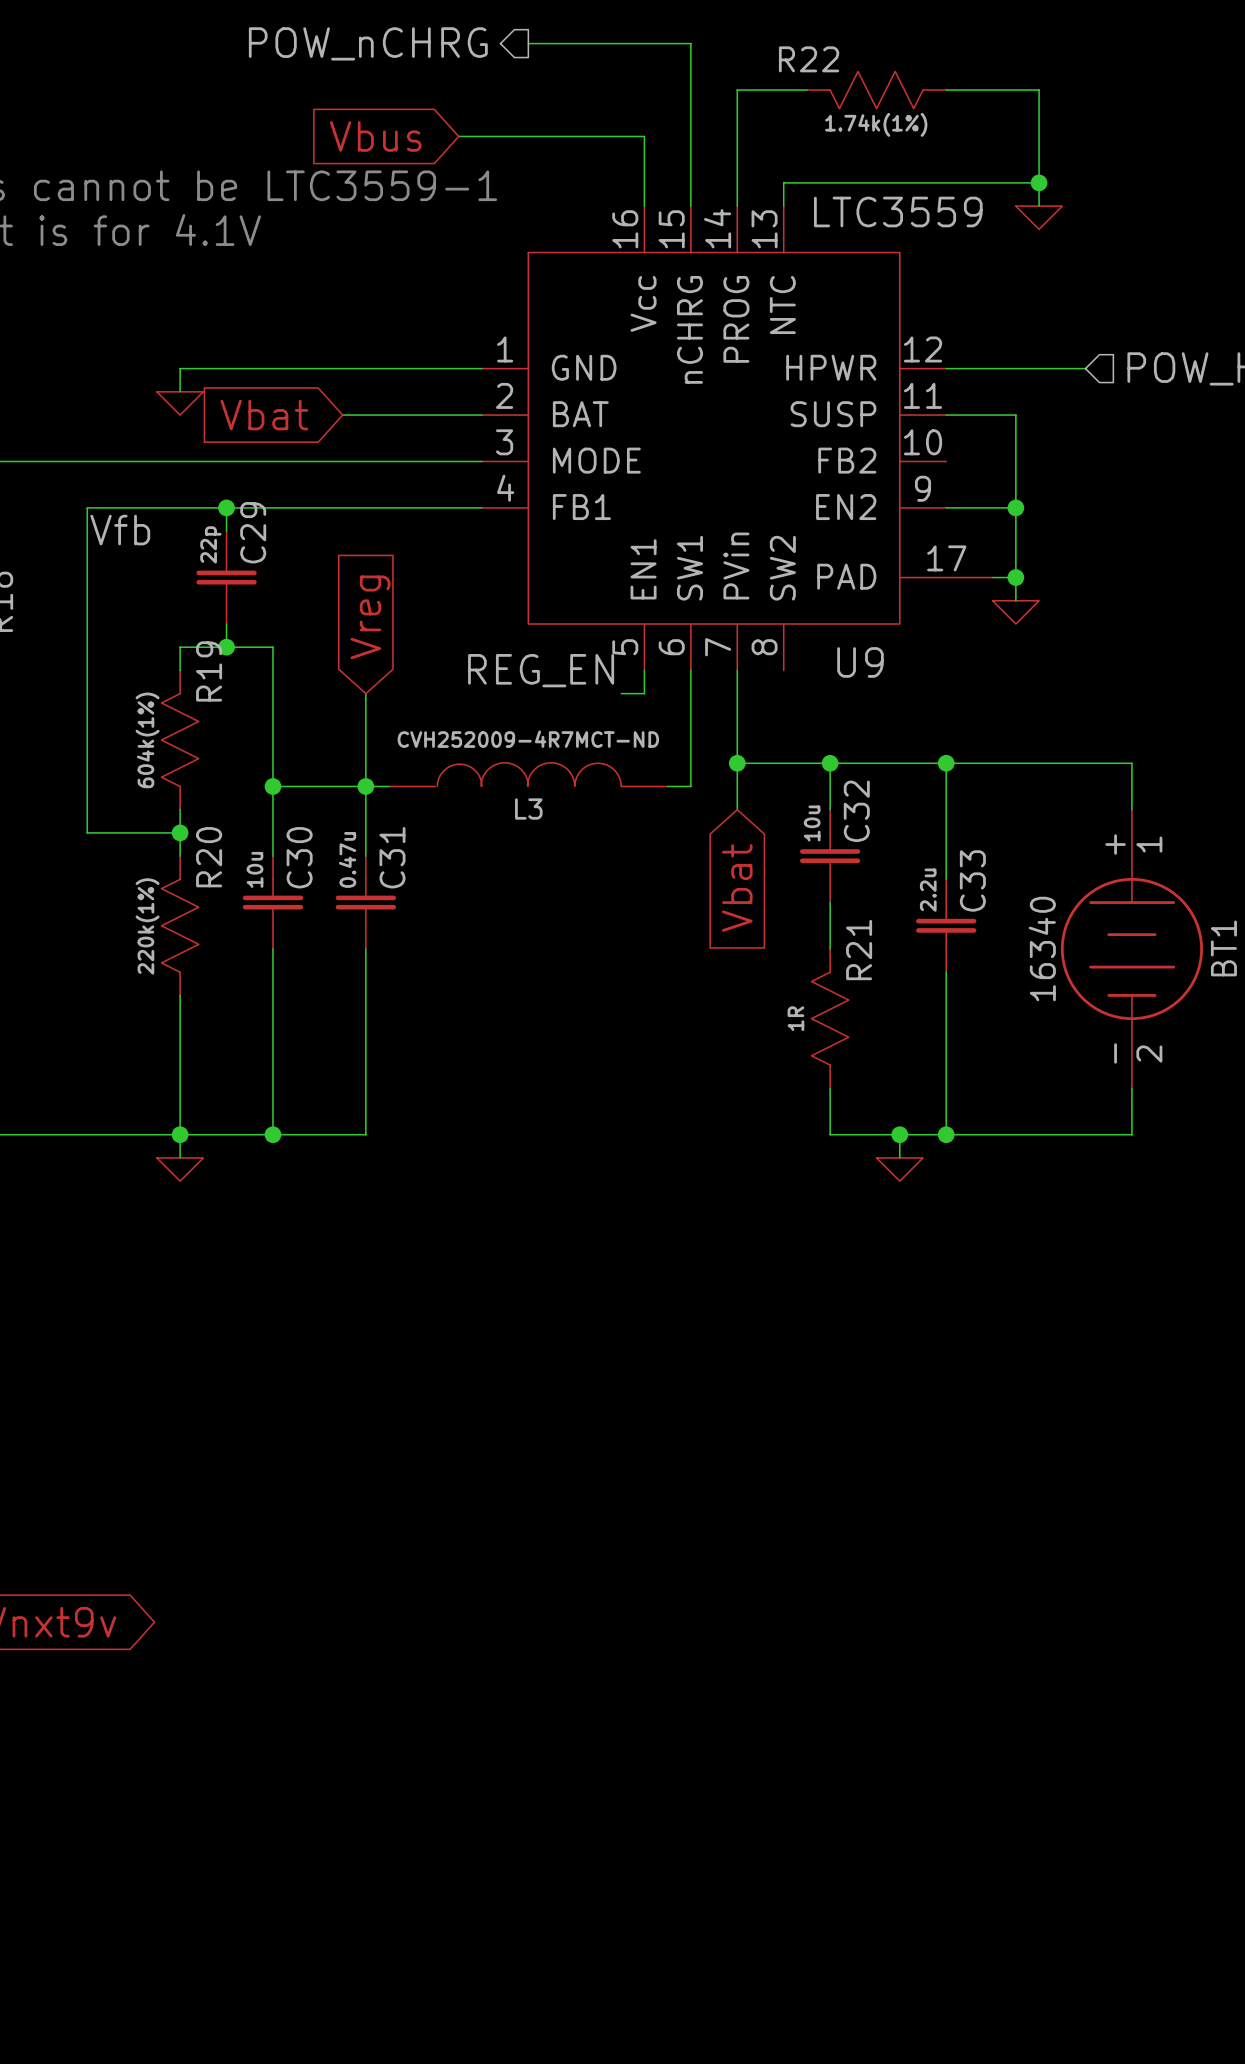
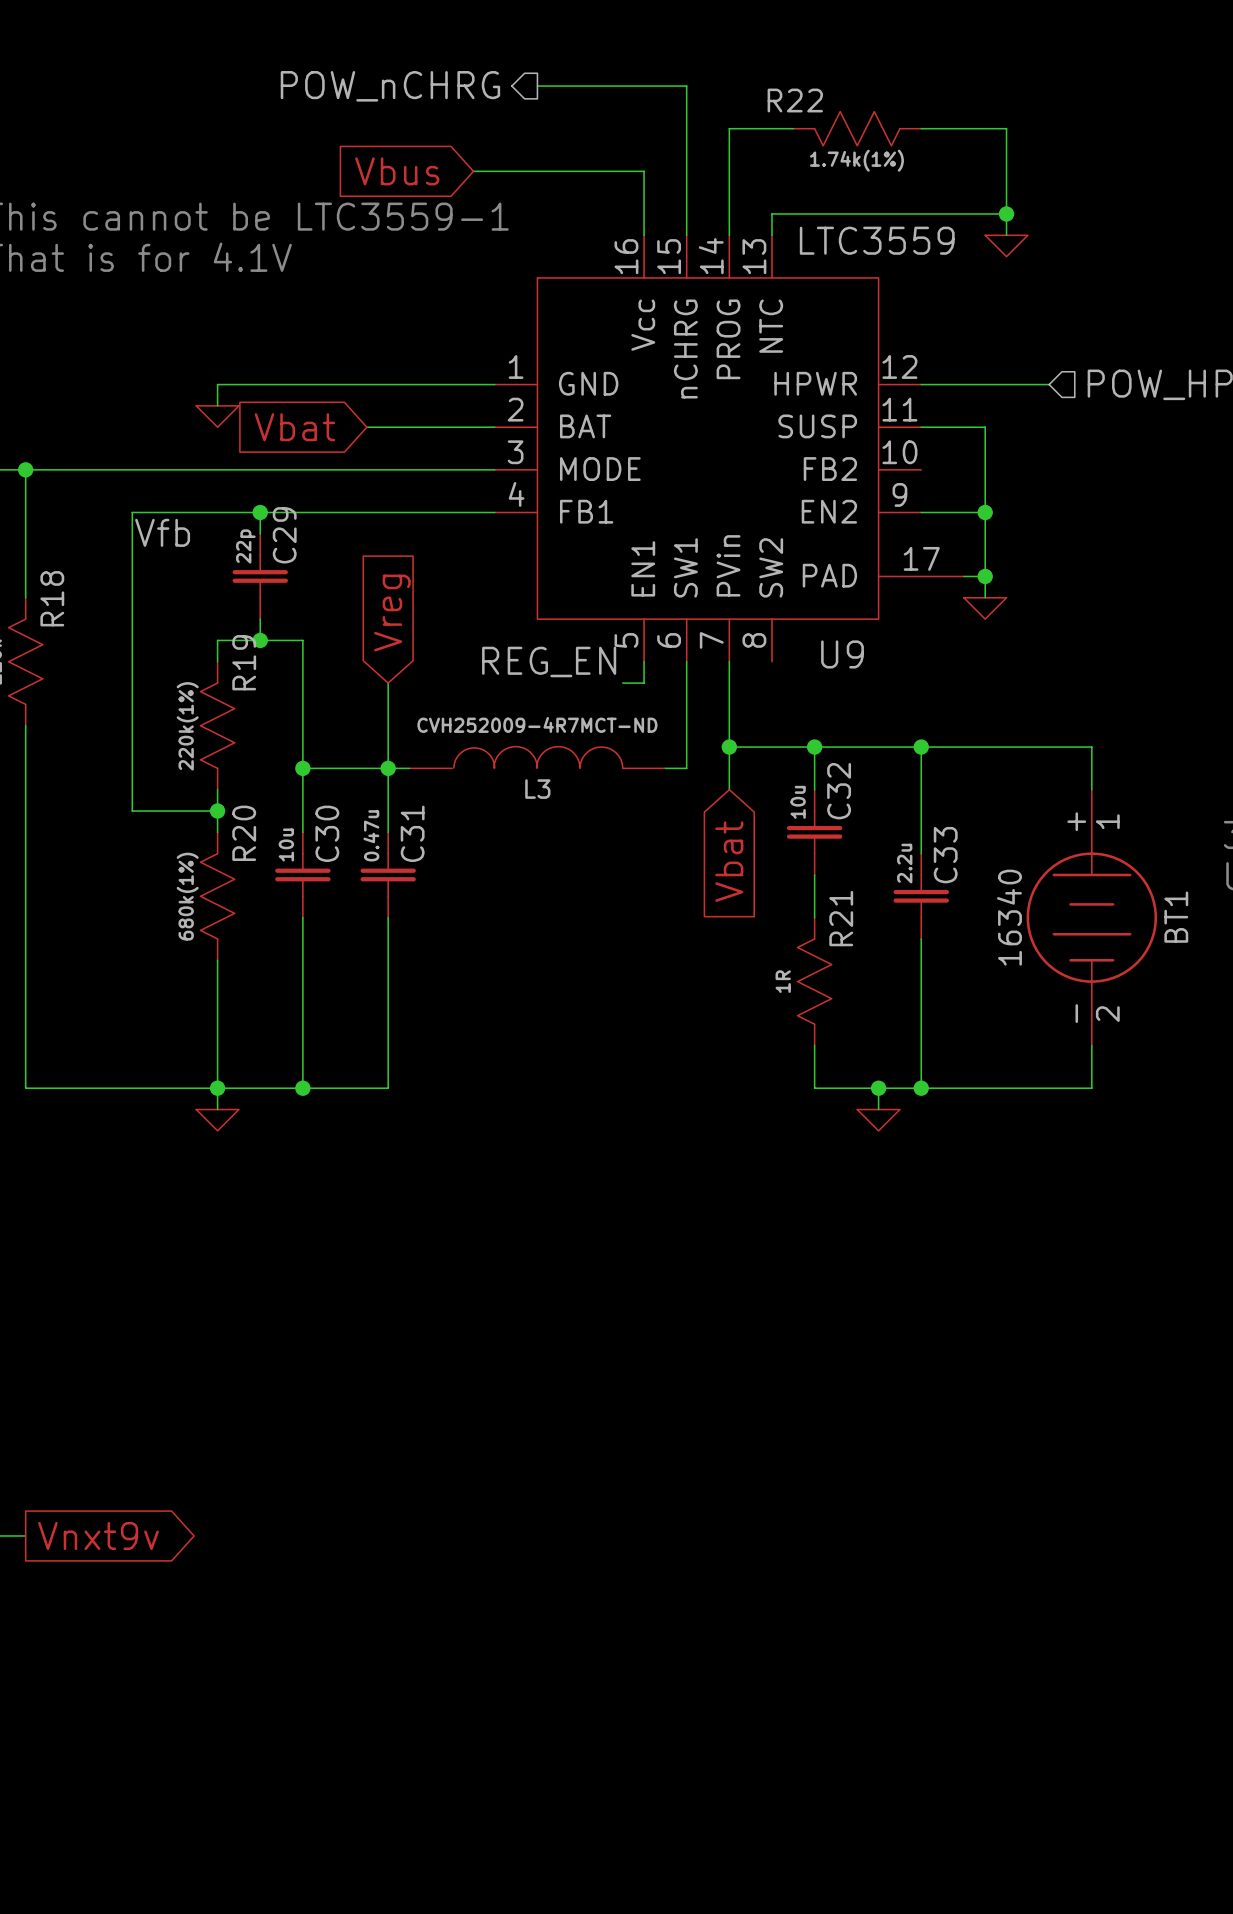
R19 value: 604k(1%) (147, 740) -> 220k(1%) (187, 726)
R20 value: 220k(1%) (147, 926) -> 680k(1%) (187, 896)

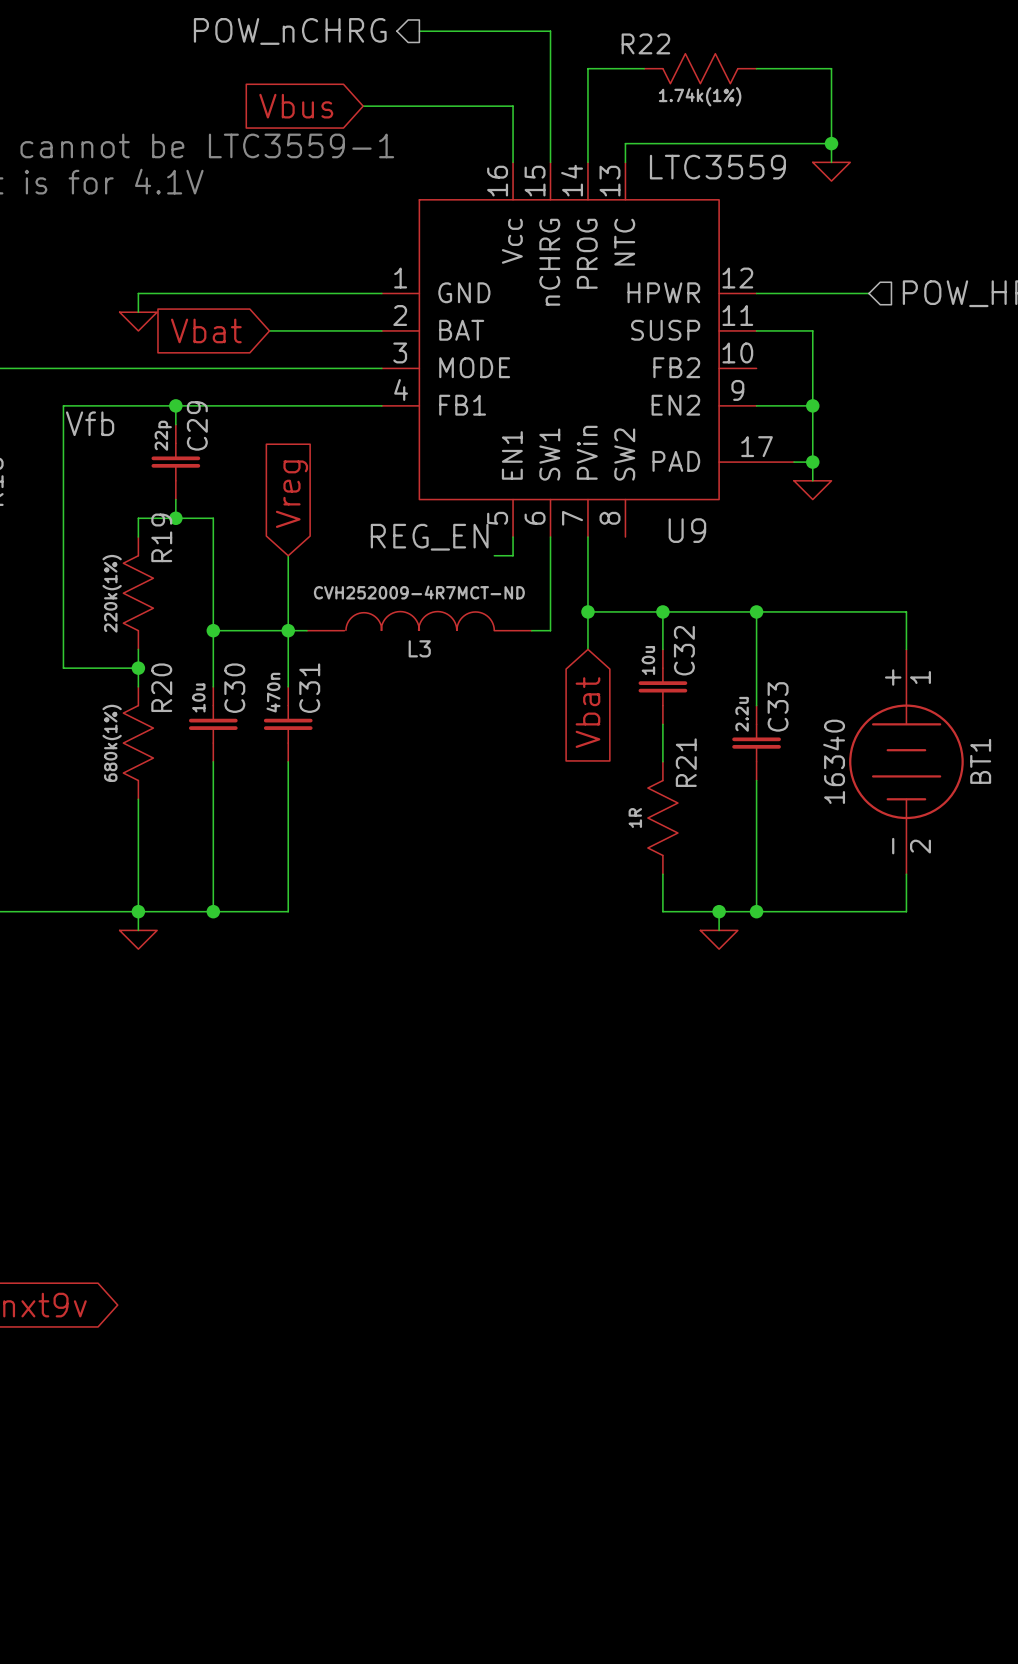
C31 value: 0.47u (371, 835) -> 470n (273, 692)

